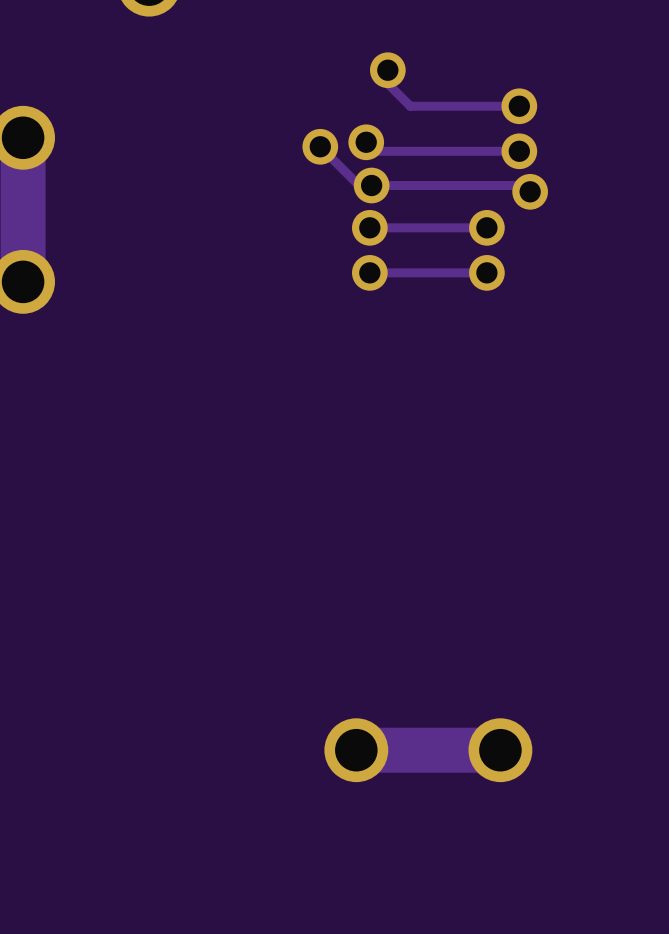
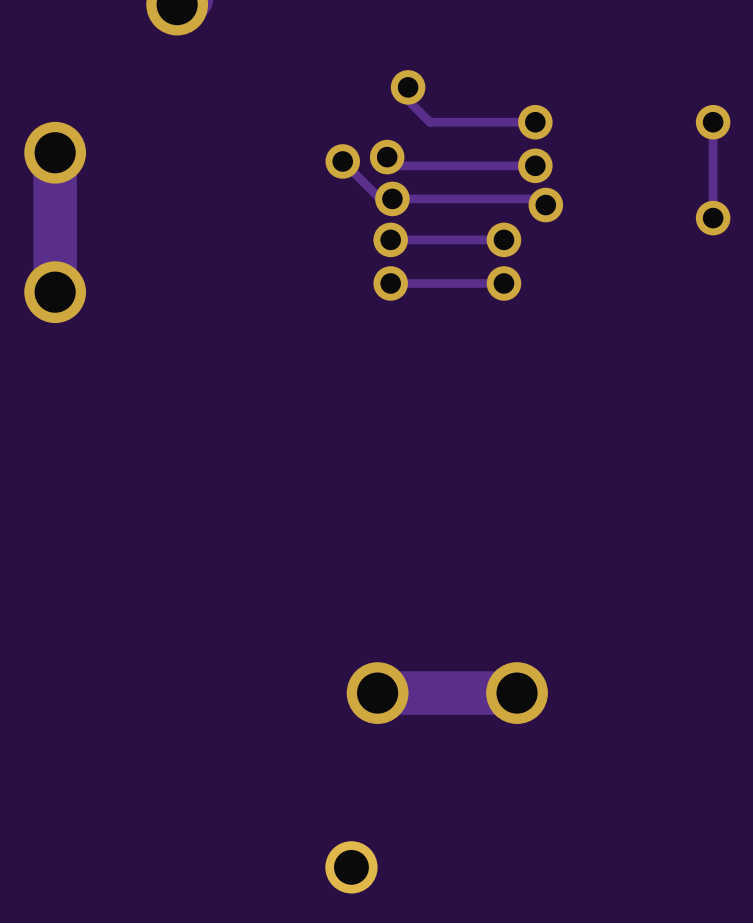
via position: (356, 750) -> (377, 693)
track: (500, 750) (356, 750) -> (517, 693) (377, 693)
via position: (500, 750) -> (517, 693)
part: none -> (351, 867)

